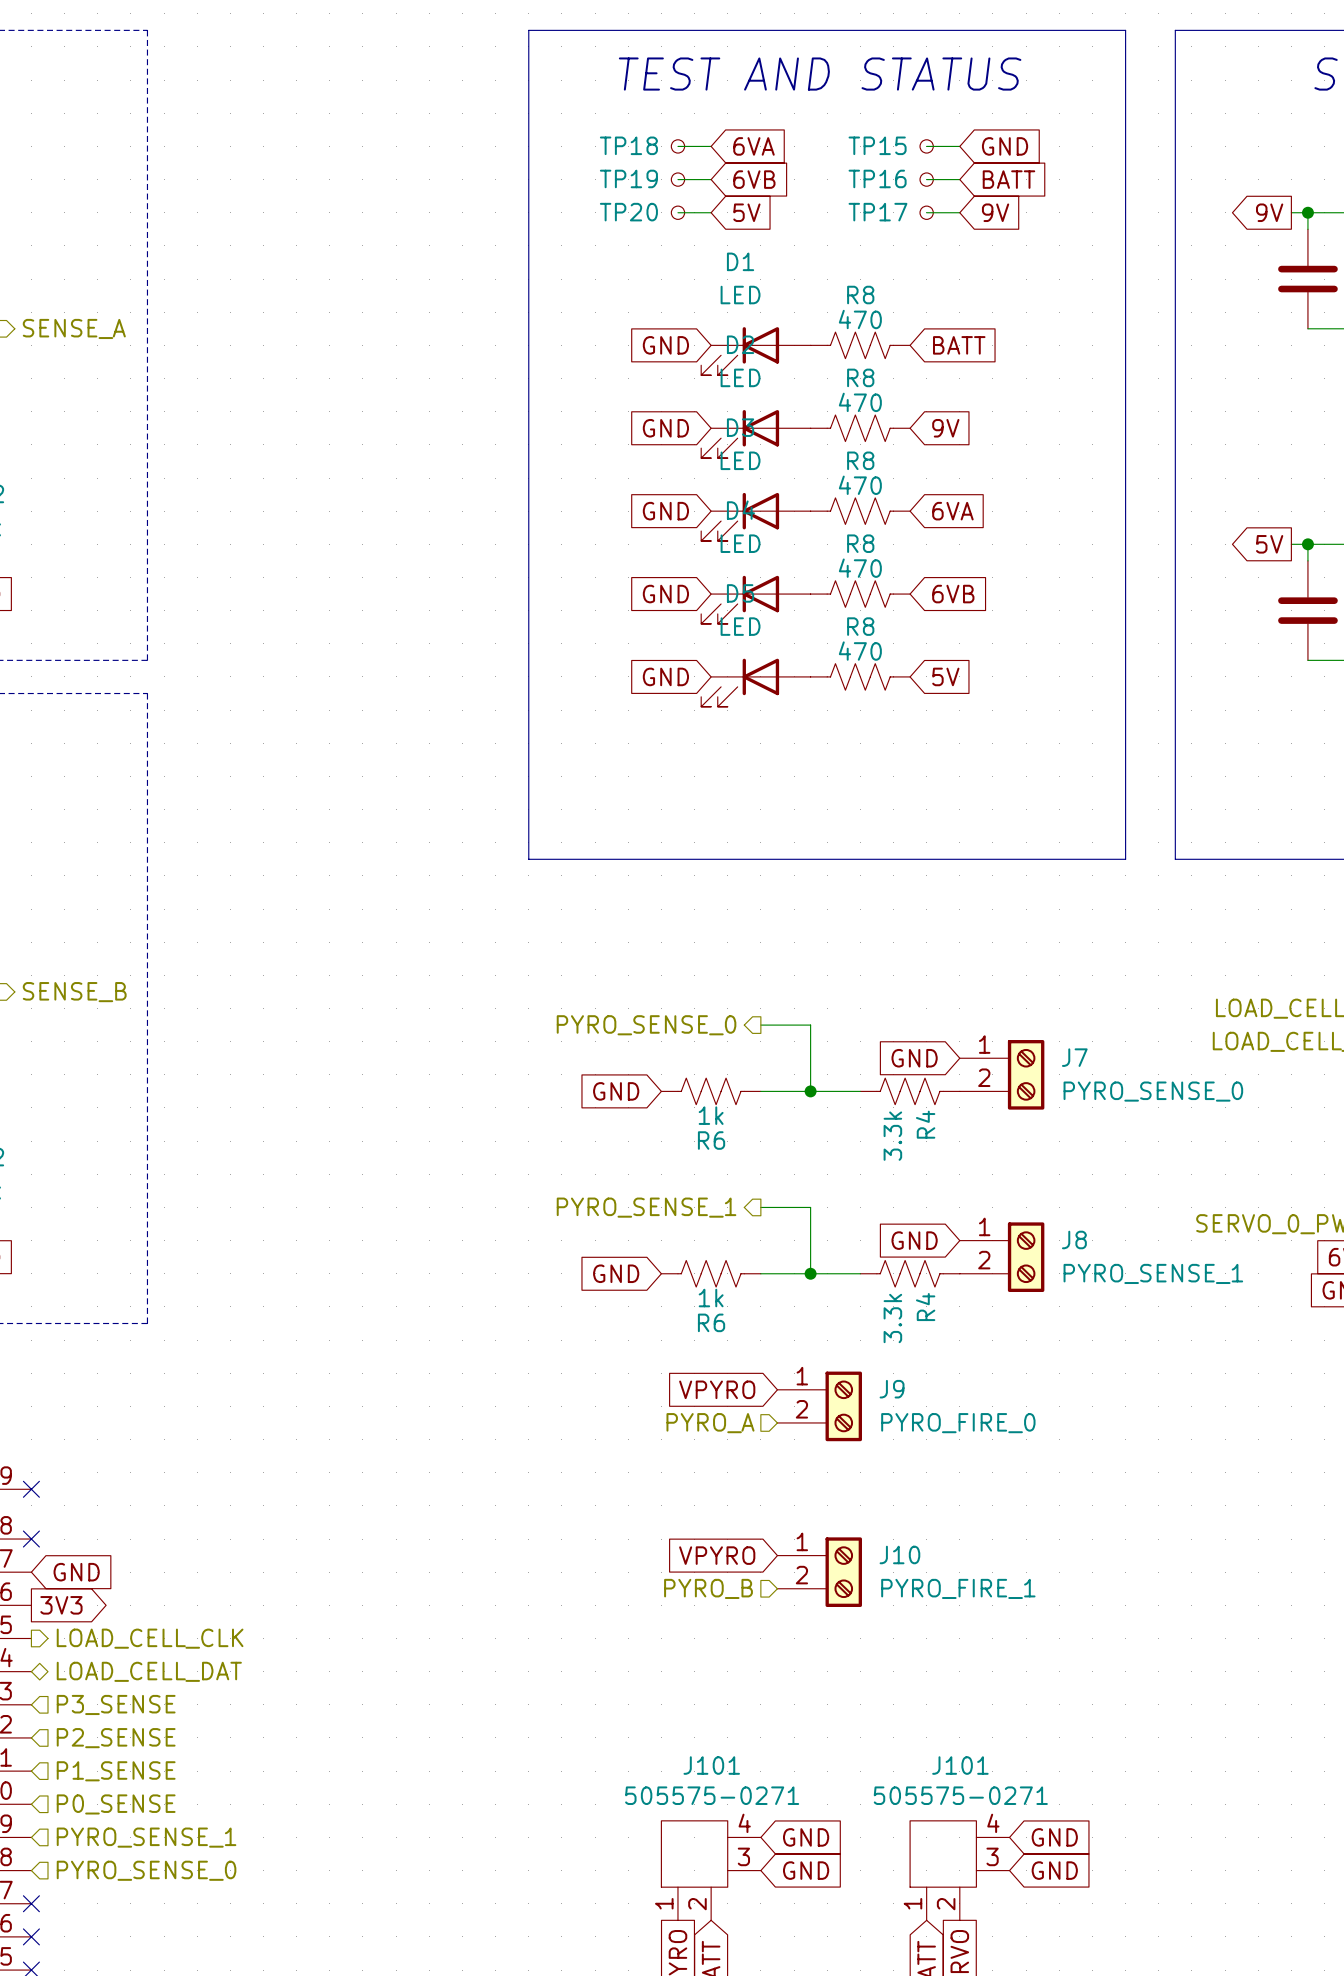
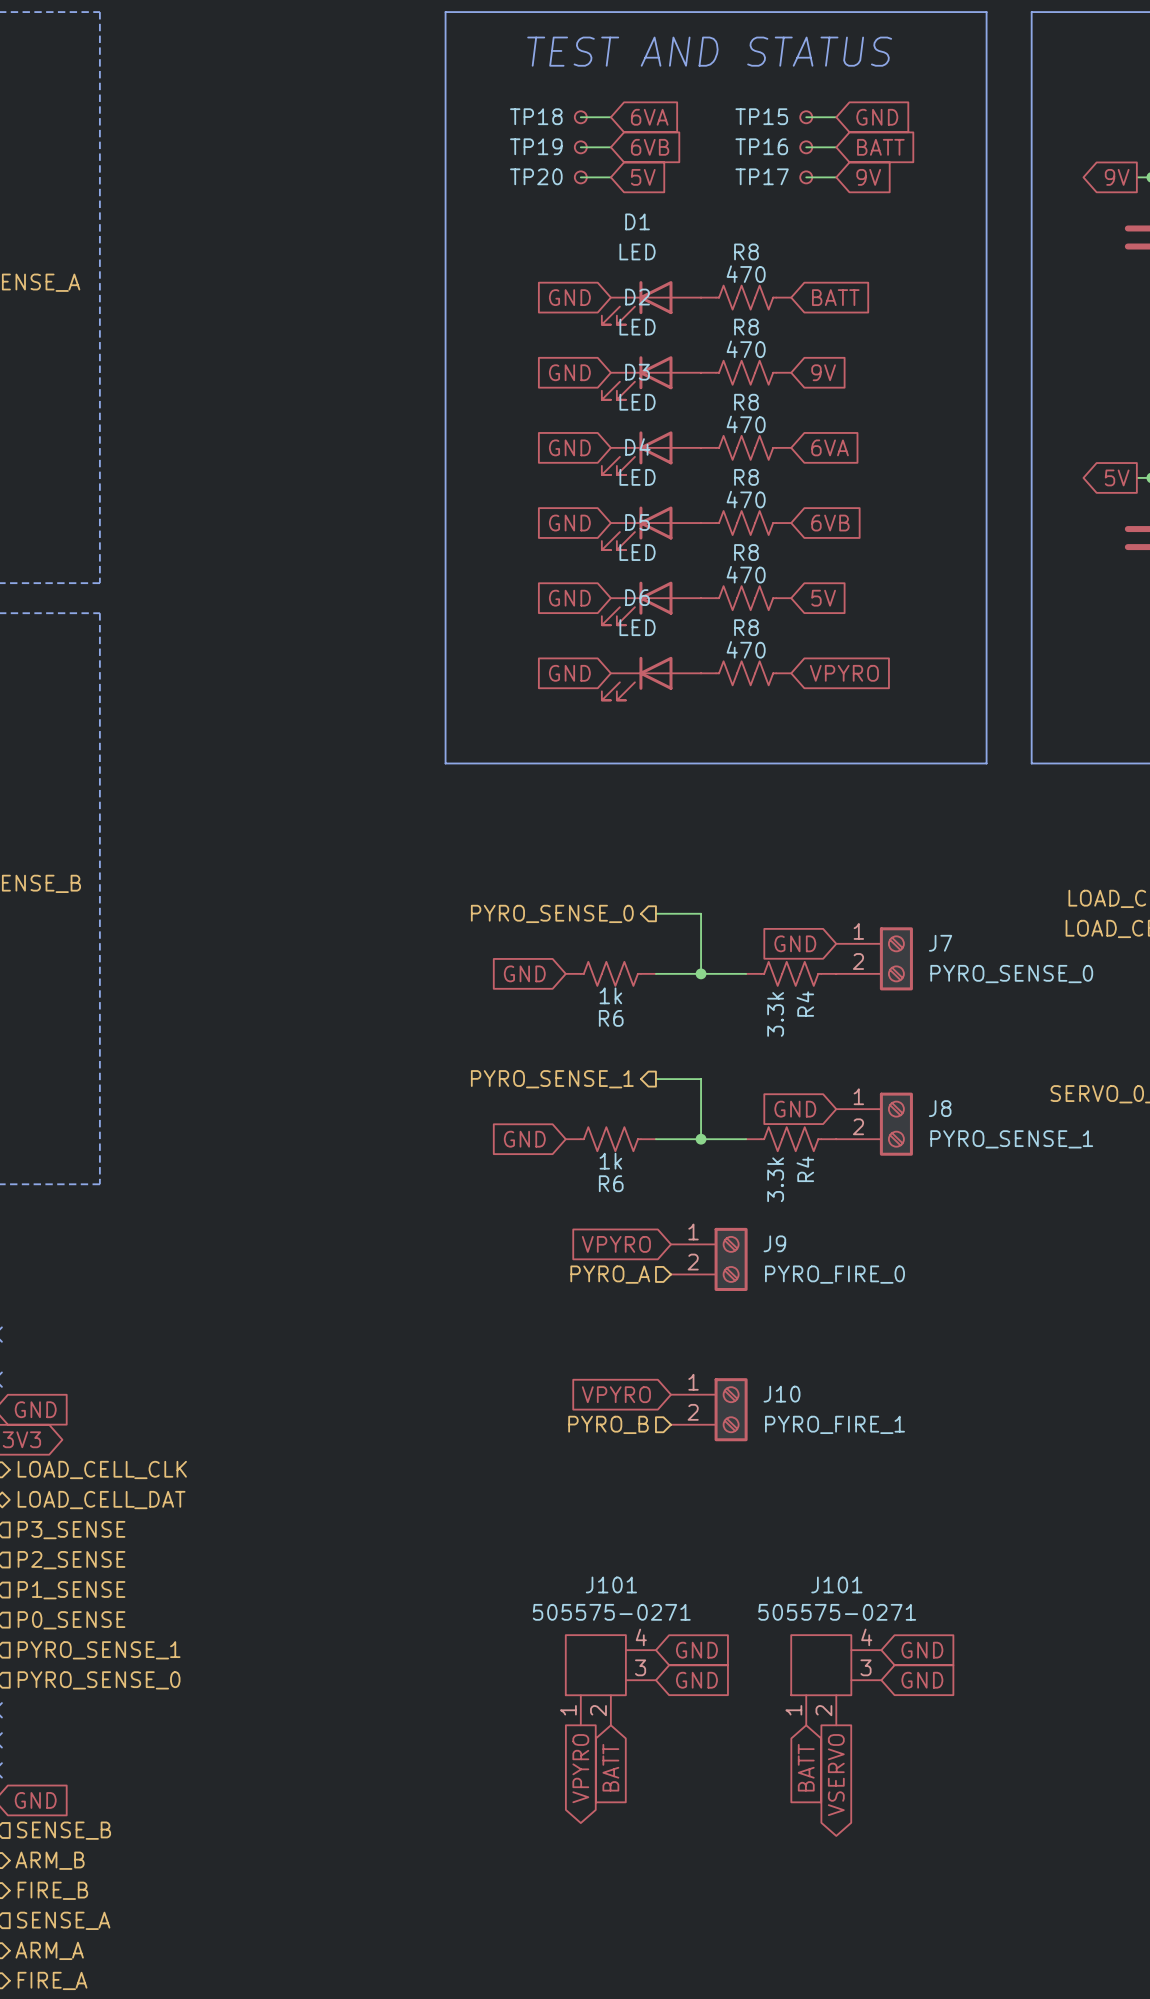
global label: none -> GND (569, 673)
R8: none -> 470 (746, 673)
global label: none -> VPYRO (844, 673)
D6: none -> LED (651, 678)

